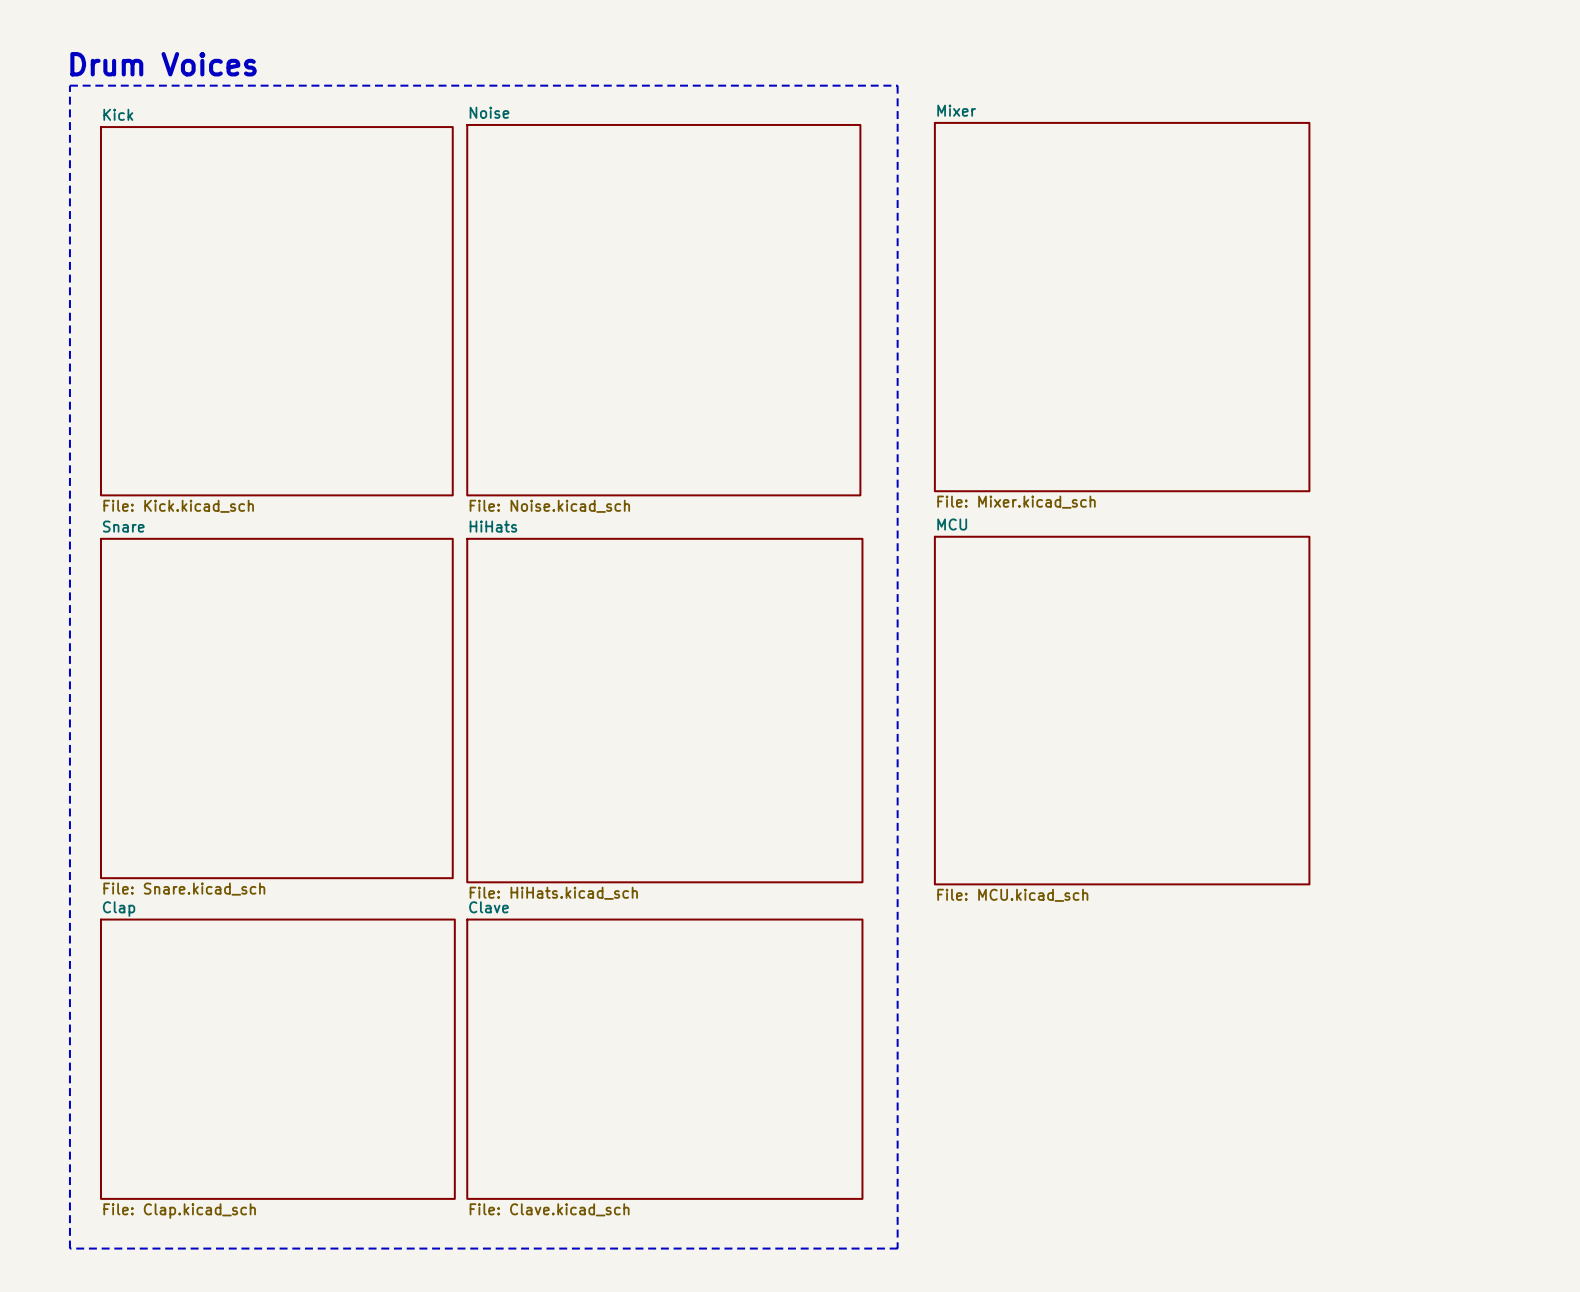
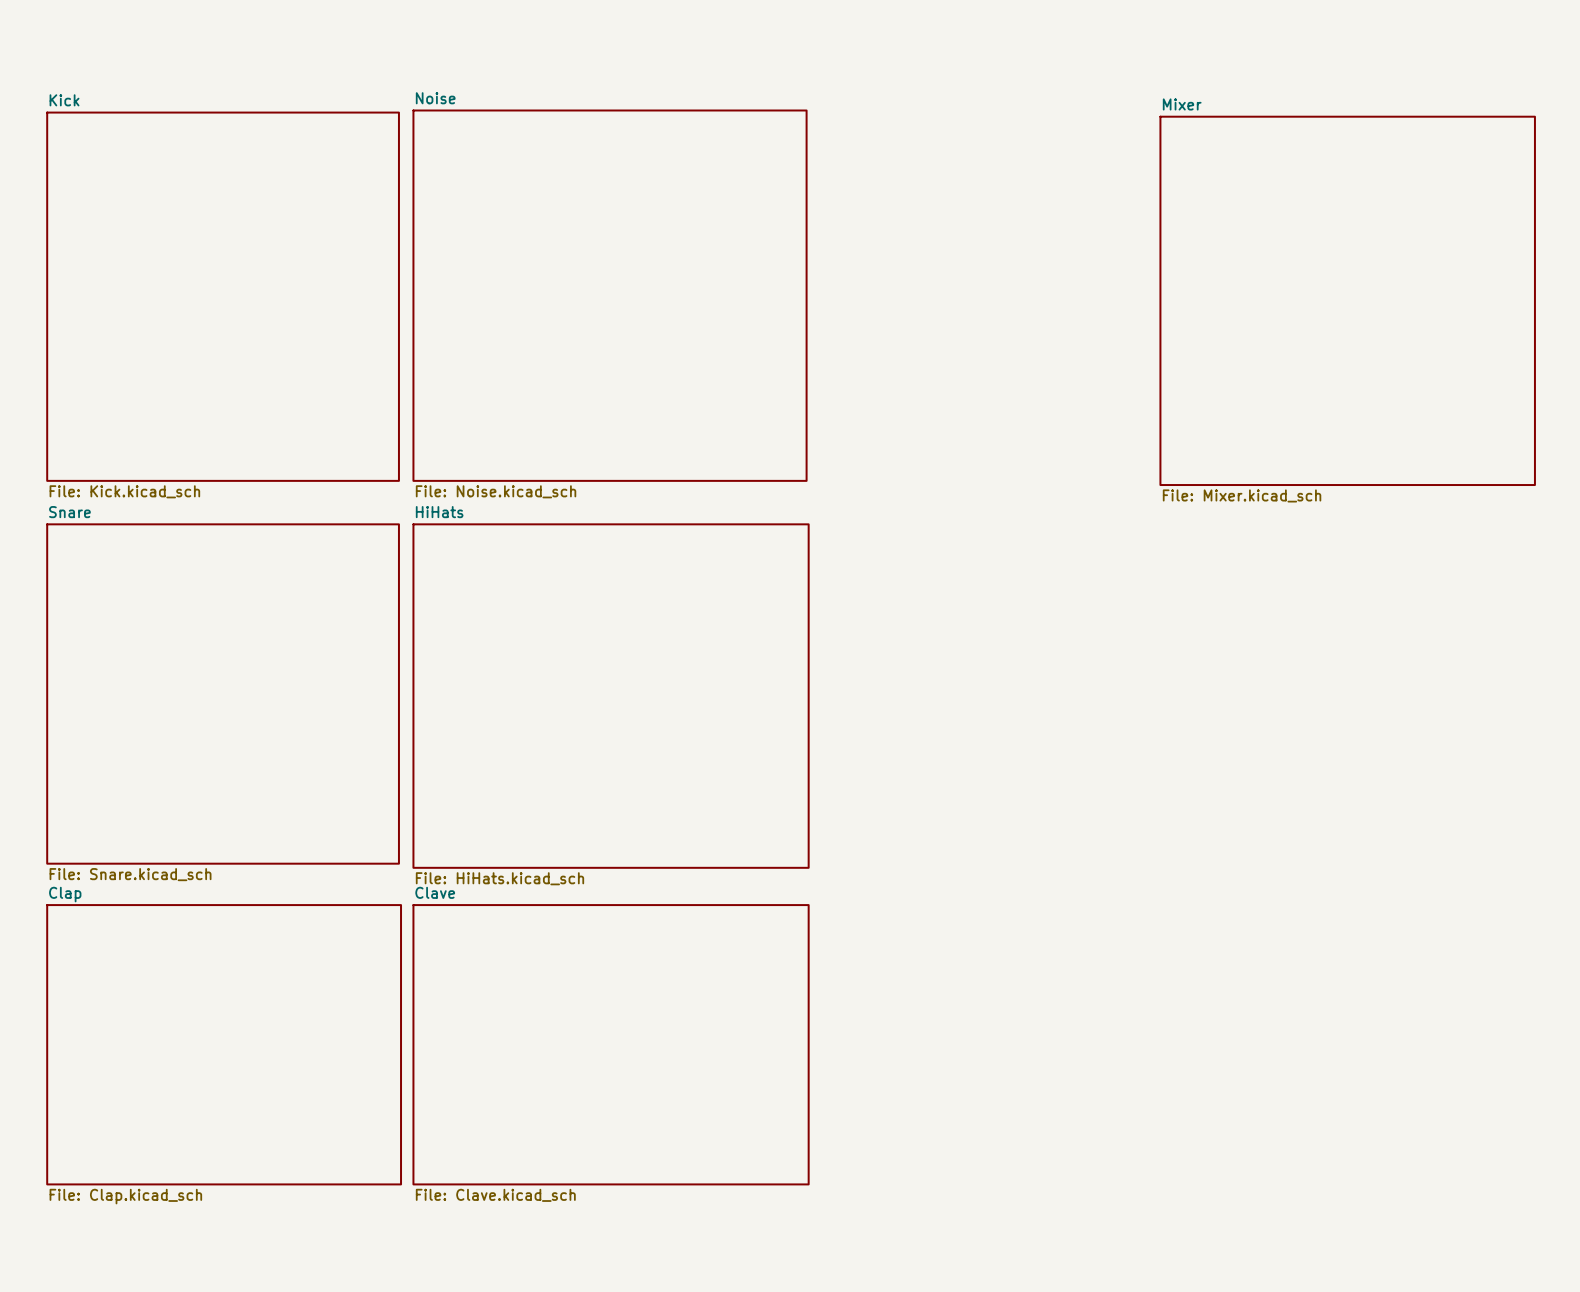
text: Drum Voices (163, 64) -> none
line: (69, 85) (897, 85) (897, 1248) (69, 1248) (69, 85) -> none
sheet Mixer: none -> File: Mixer.kicad_sch (1347, 300)
sheet Mixer: File: Mixer.kicad_sch (1122, 307) -> none
sheet Noise position: (663, 310) -> (610, 295)
sheet Kick position: (276, 311) -> (223, 296)
sheet Snare position: (276, 708) -> (223, 694)
sheet HiHats position: (664, 710) -> (611, 696)
sheet MCU: File: MCU.kicad_sch (1122, 710) -> none
sheet Clap position: (277, 1059) -> (224, 1044)
sheet Clave position: (664, 1059) -> (611, 1044)

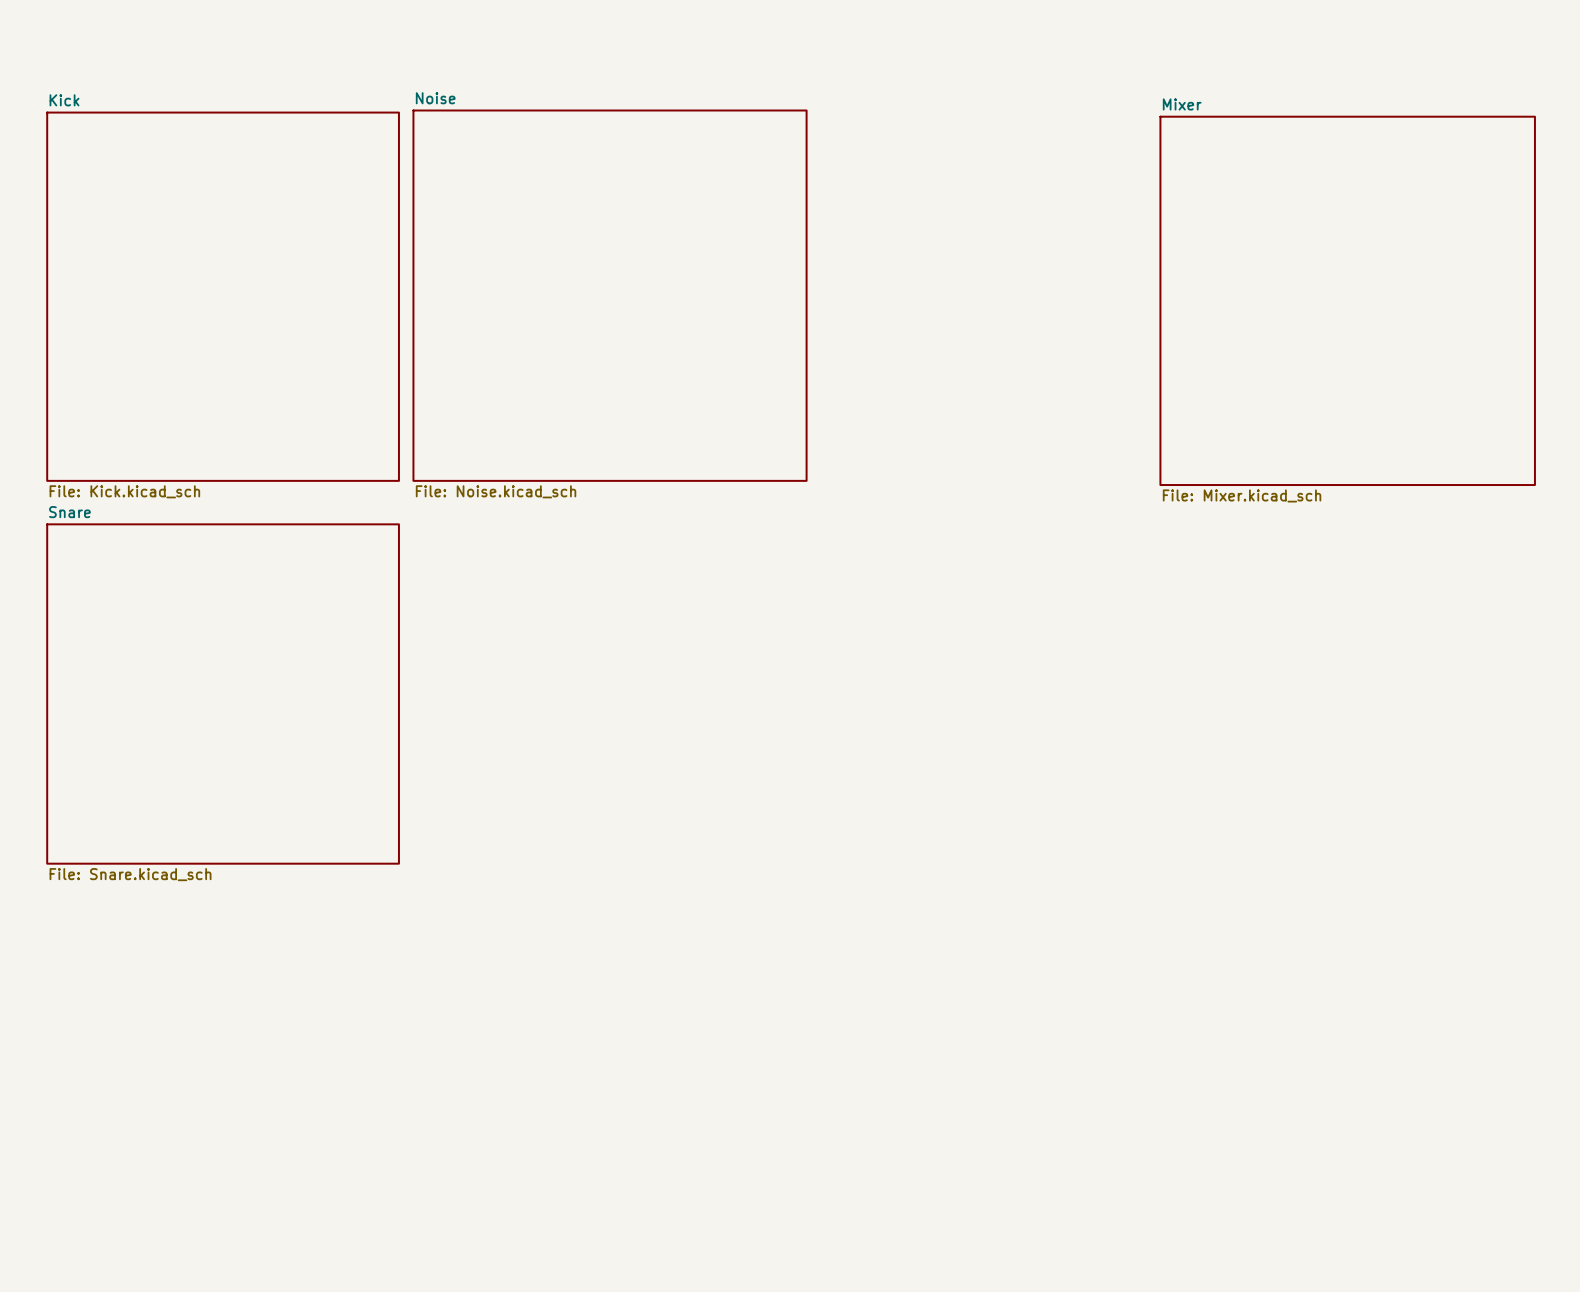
sheet HiHats: File: HiHats.kicad_sch (611, 696) -> none
sheet Clap: File: Clap.kicad_sch (224, 1044) -> none
sheet Clave: File: Clave.kicad_sch (611, 1044) -> none

